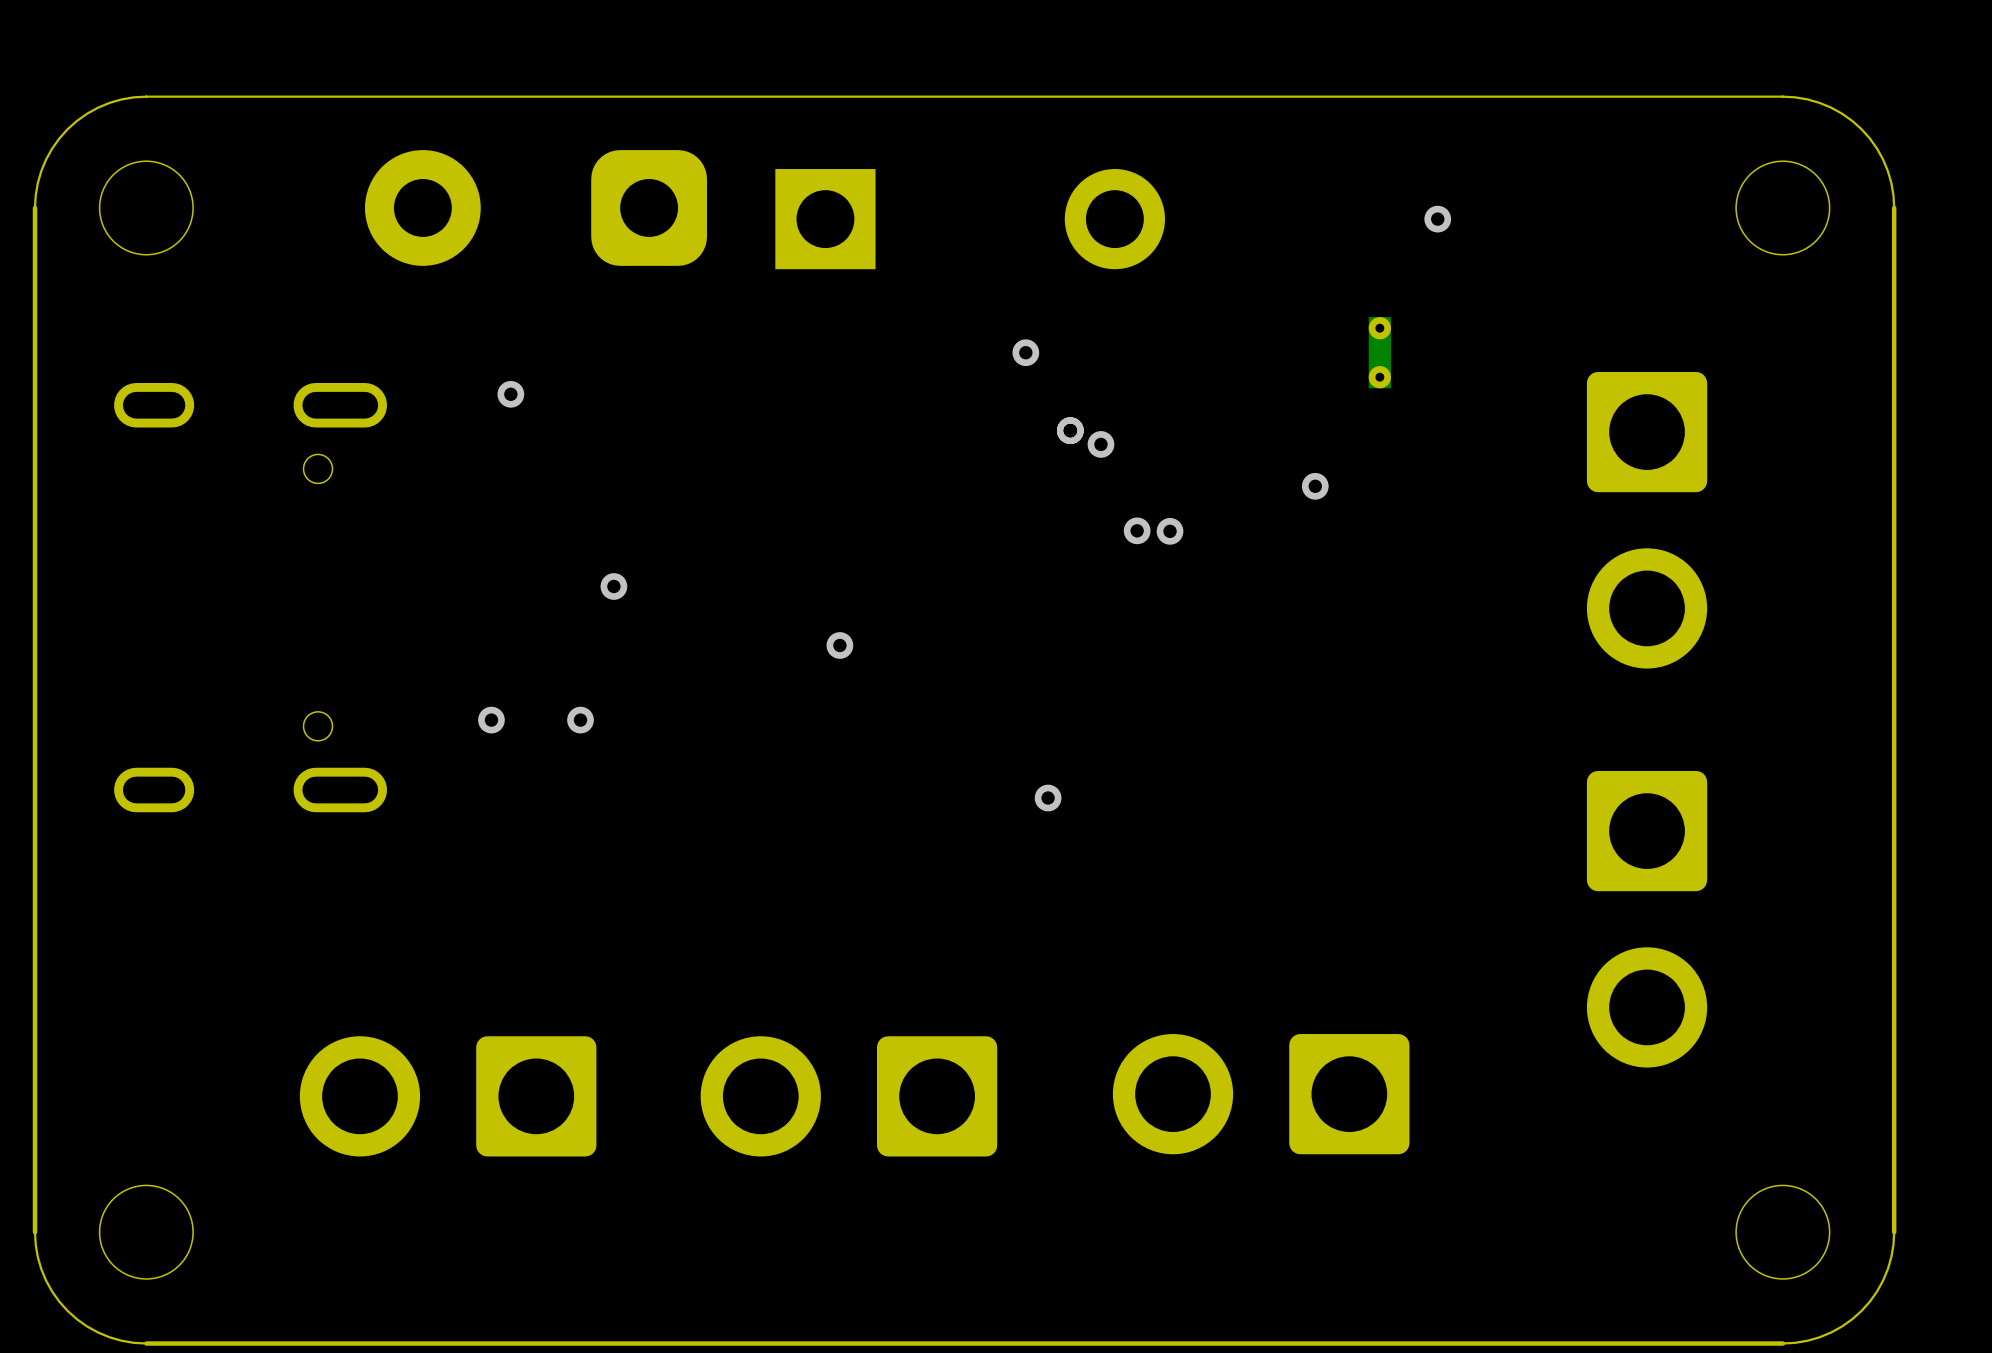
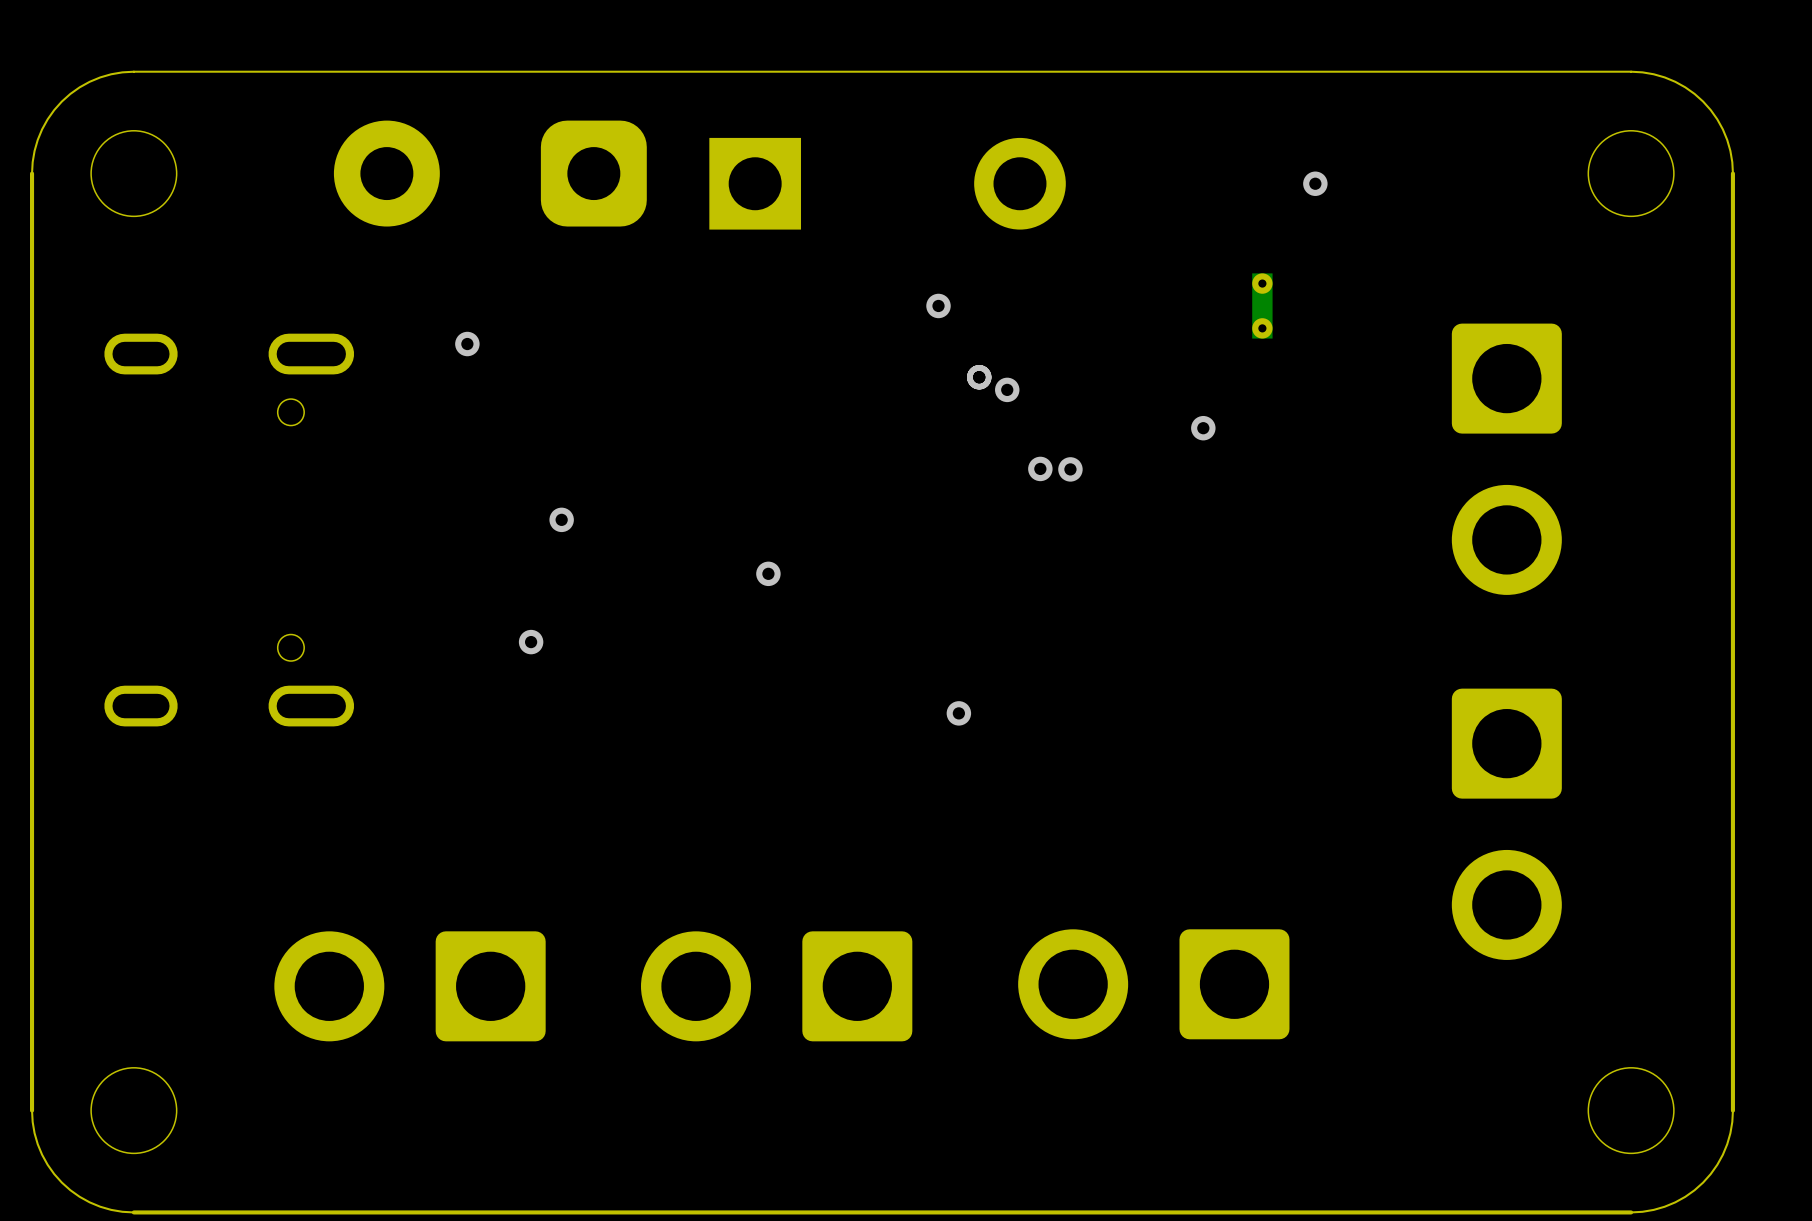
via: (491, 720) -> none

